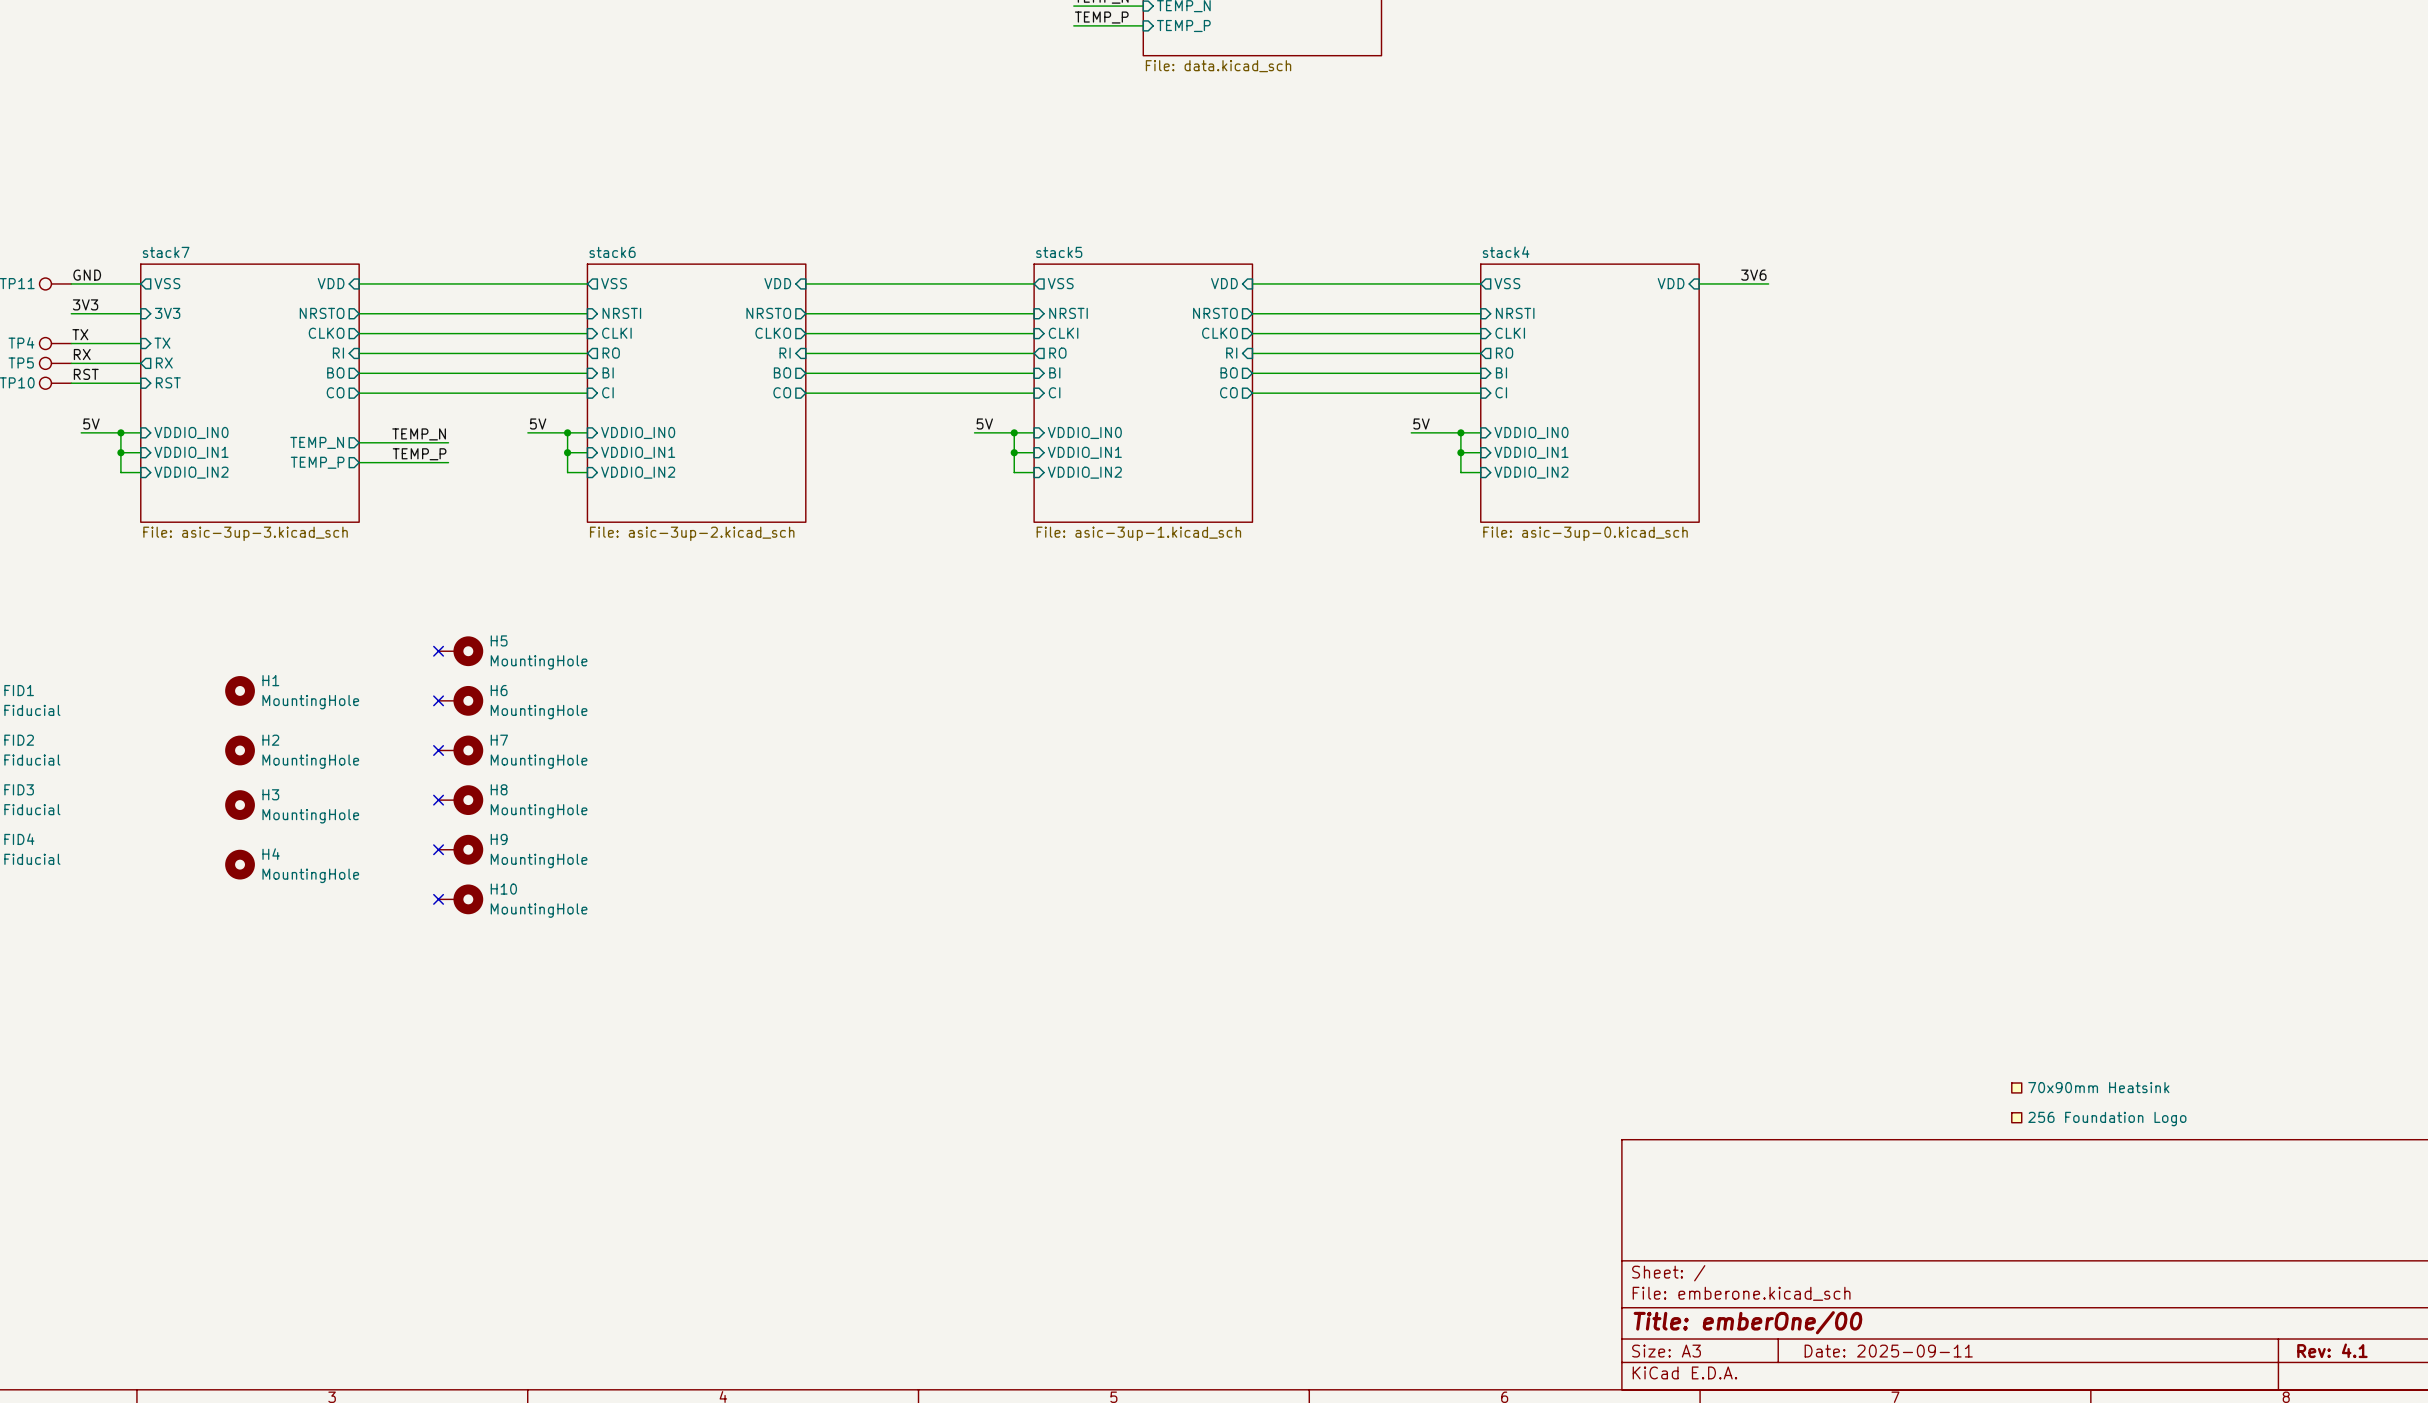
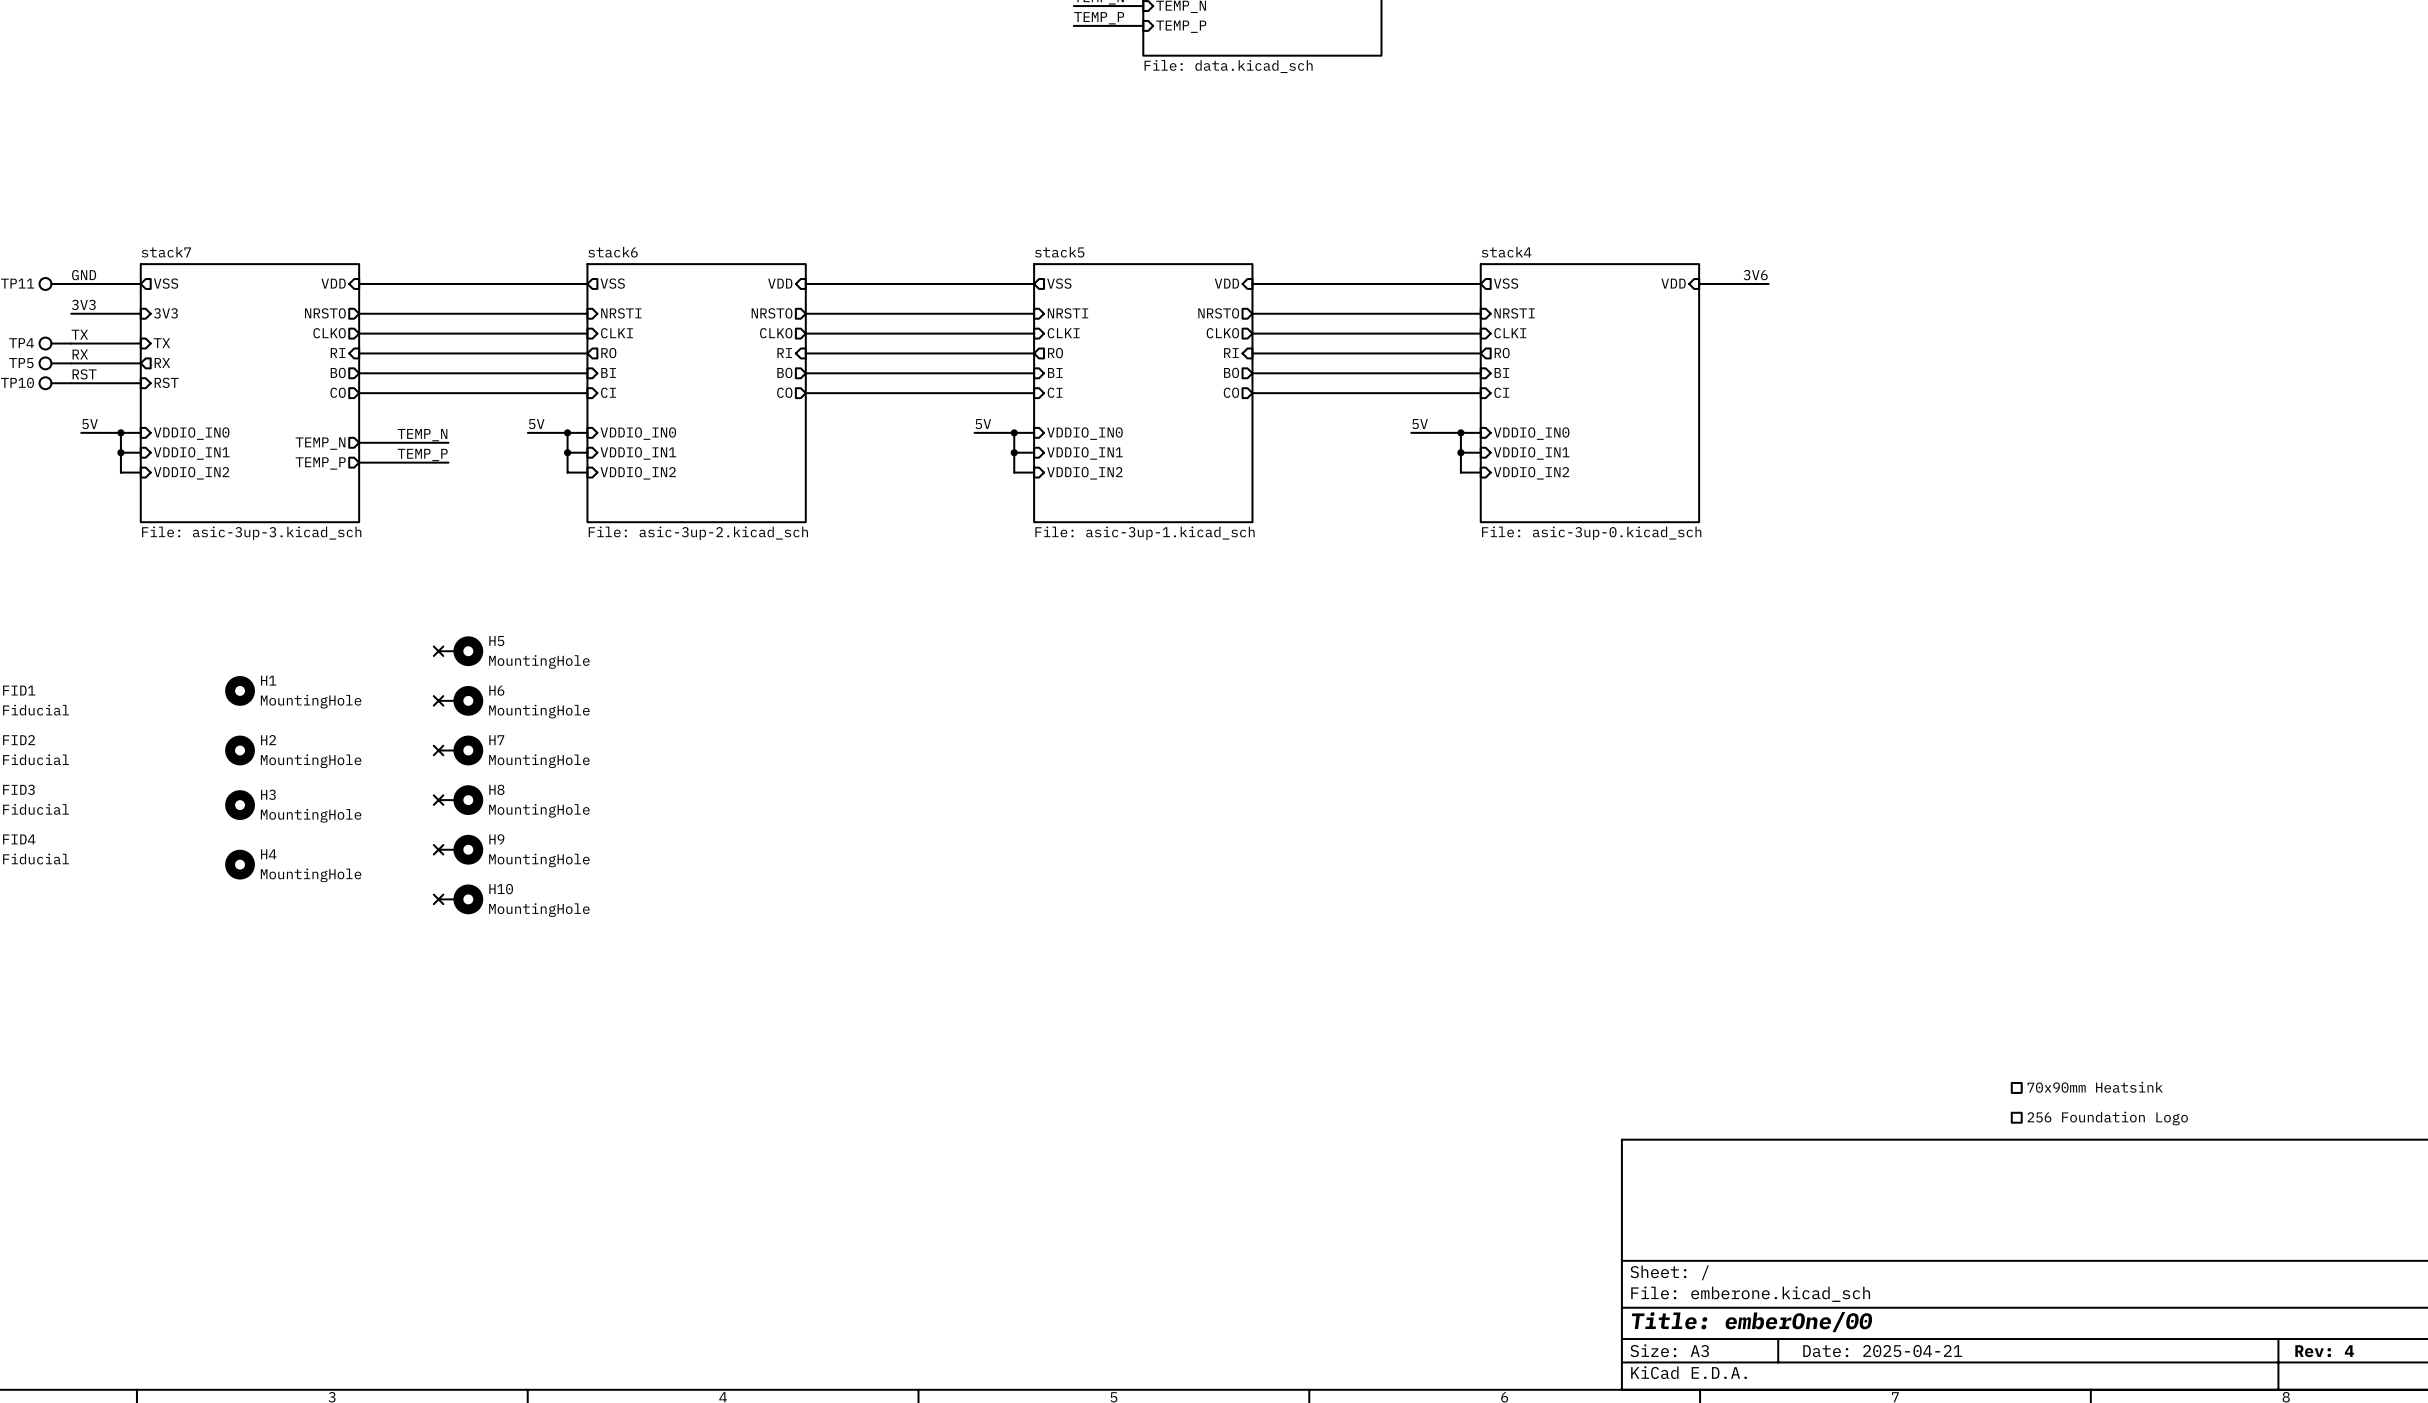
title block: Rev: 4.1 (2332, 1350) -> Rev: 4 (2324, 1351)
title block: Date: 2025-09-11 (1888, 1351) -> Date: 2025-04-21 (1882, 1351)

